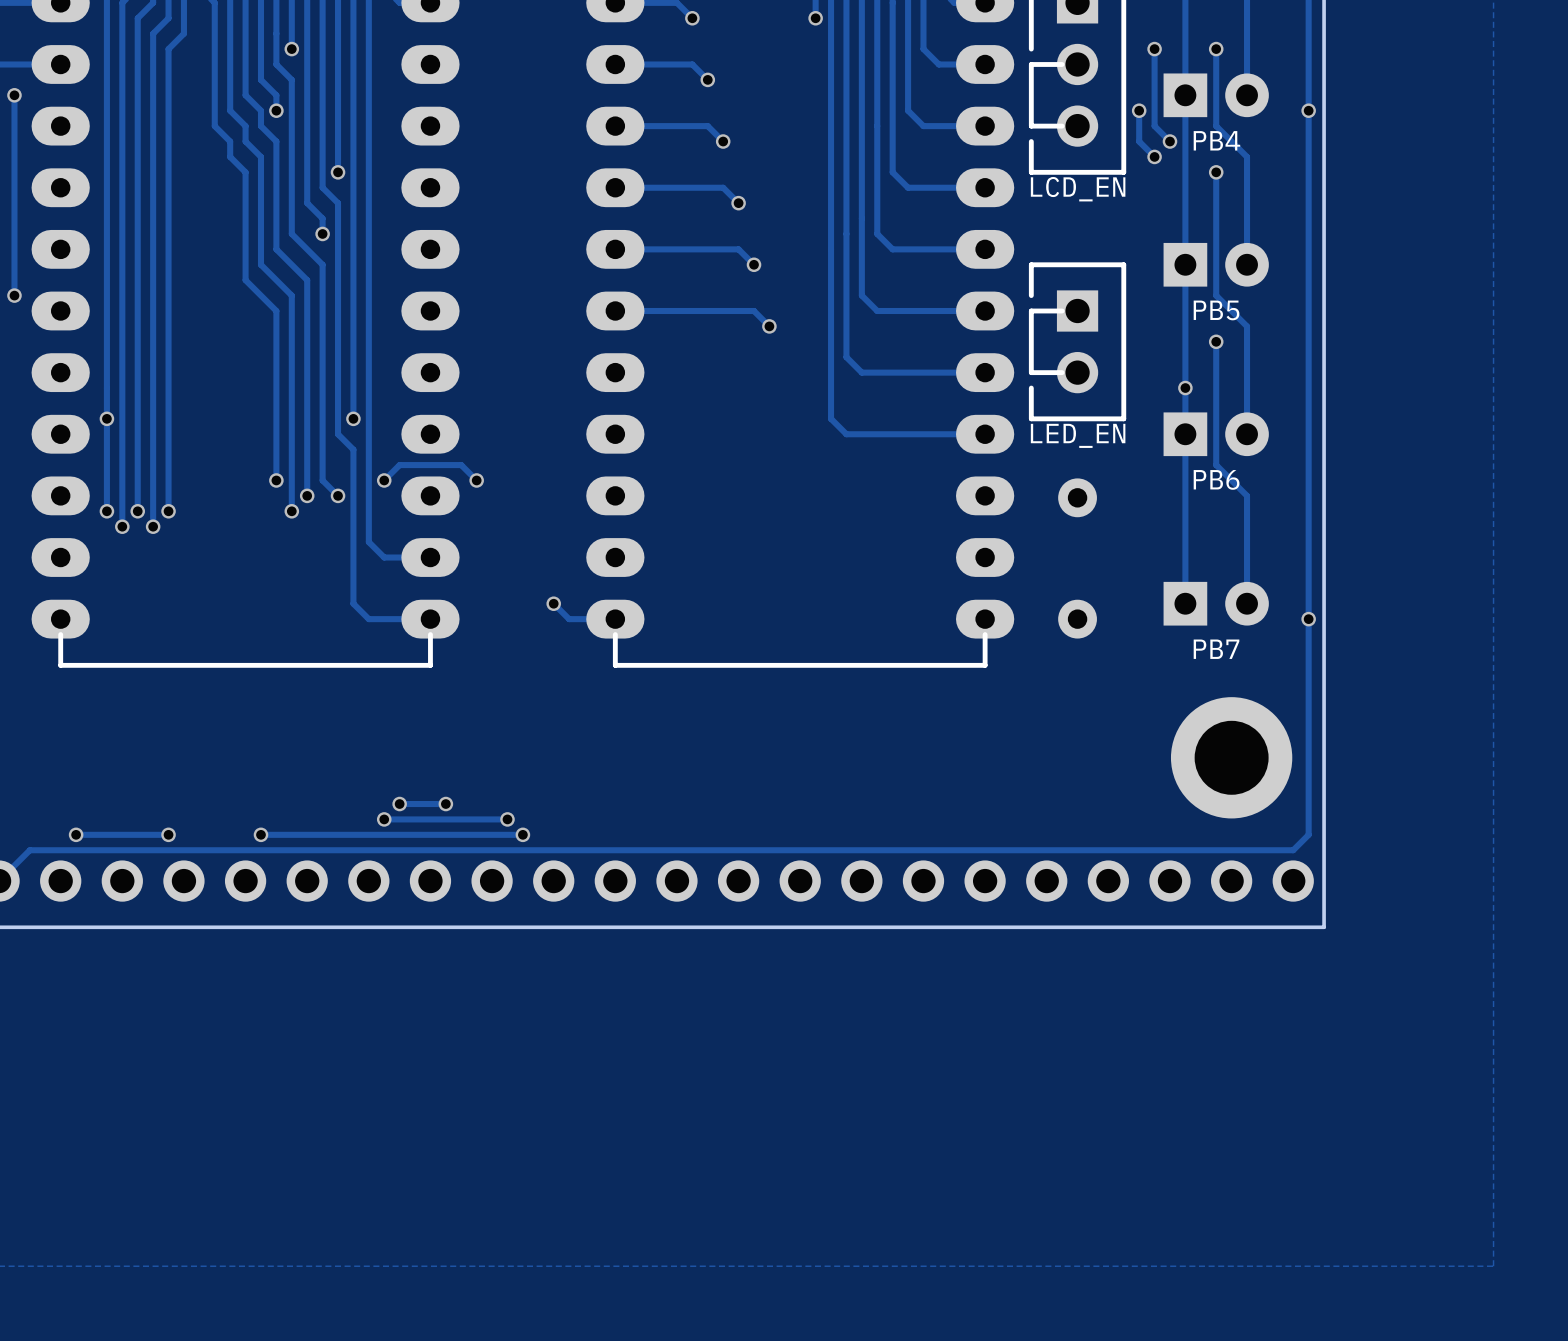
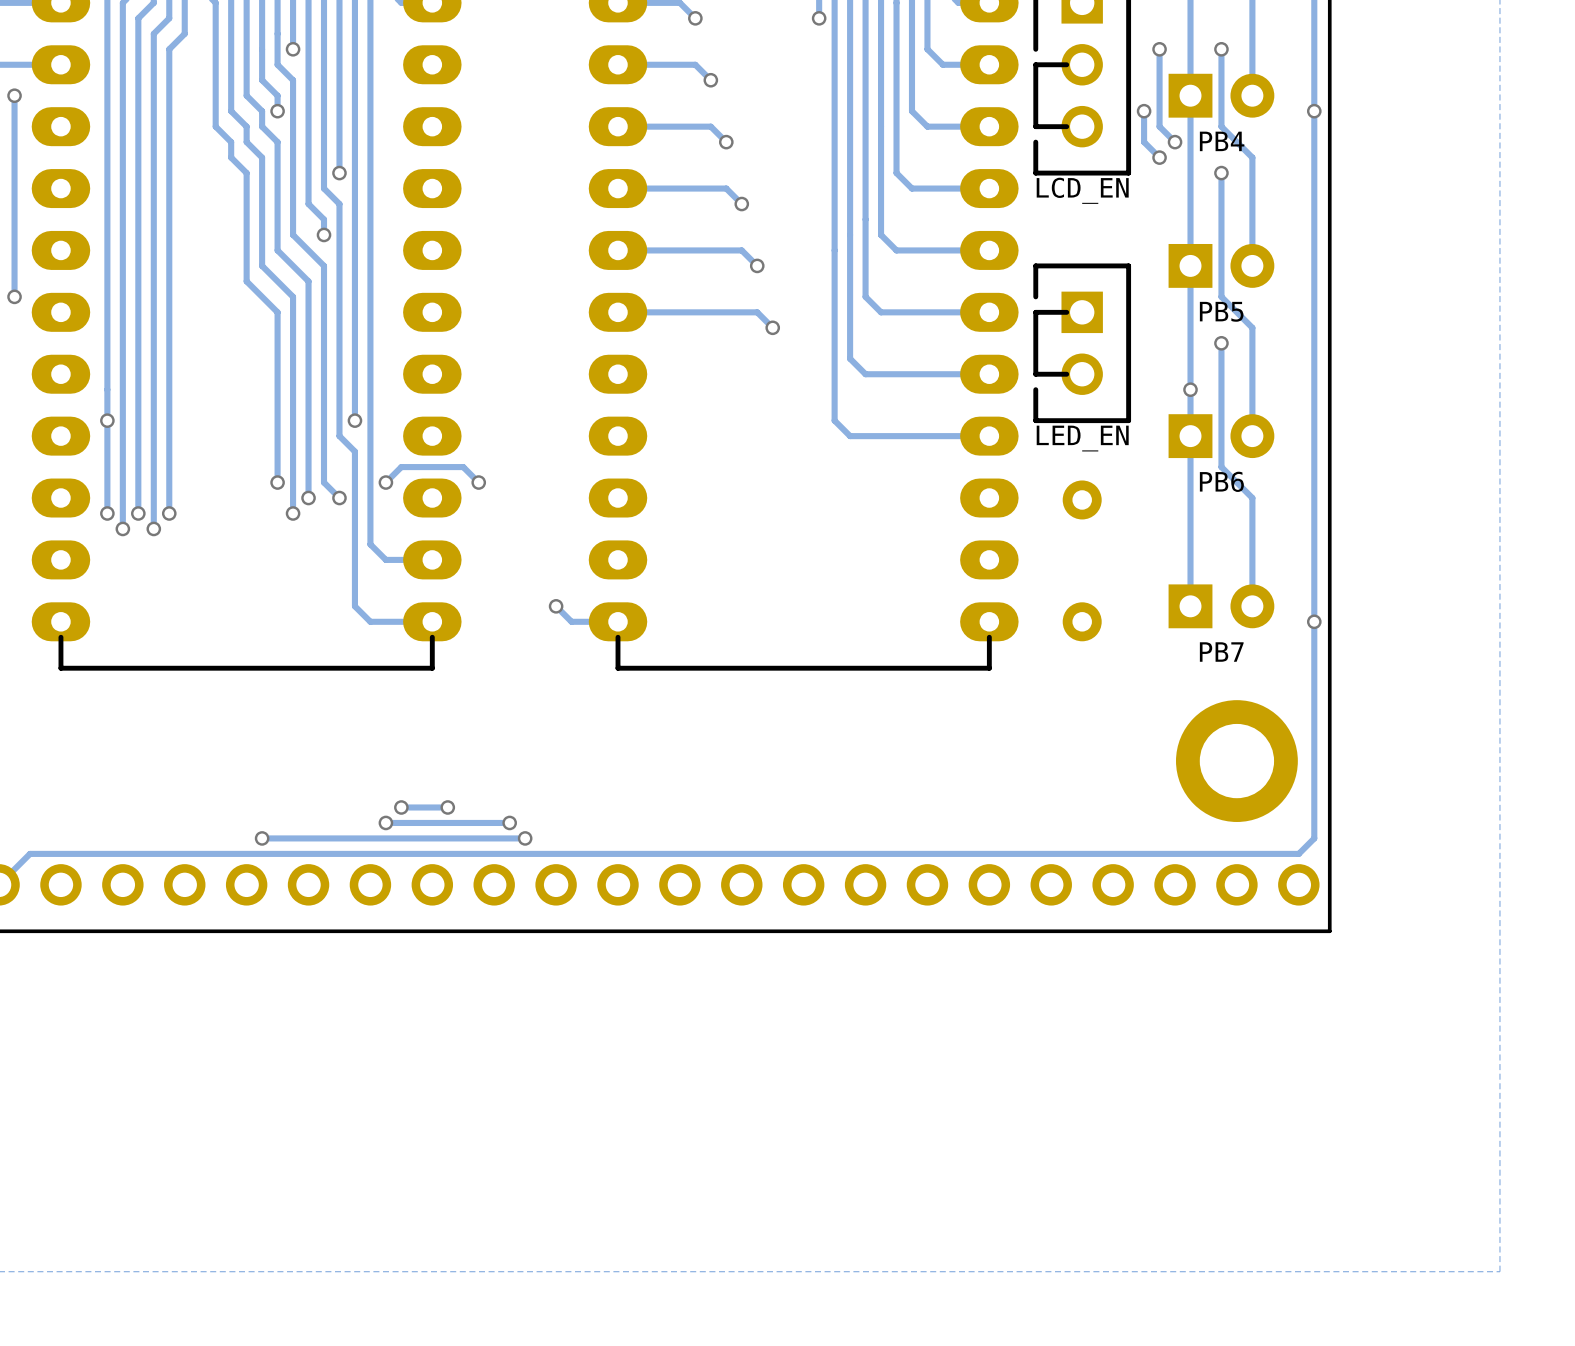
via: (76, 834) -> none
track: (168, 834) (76, 834) -> none
via: (168, 834) -> none

